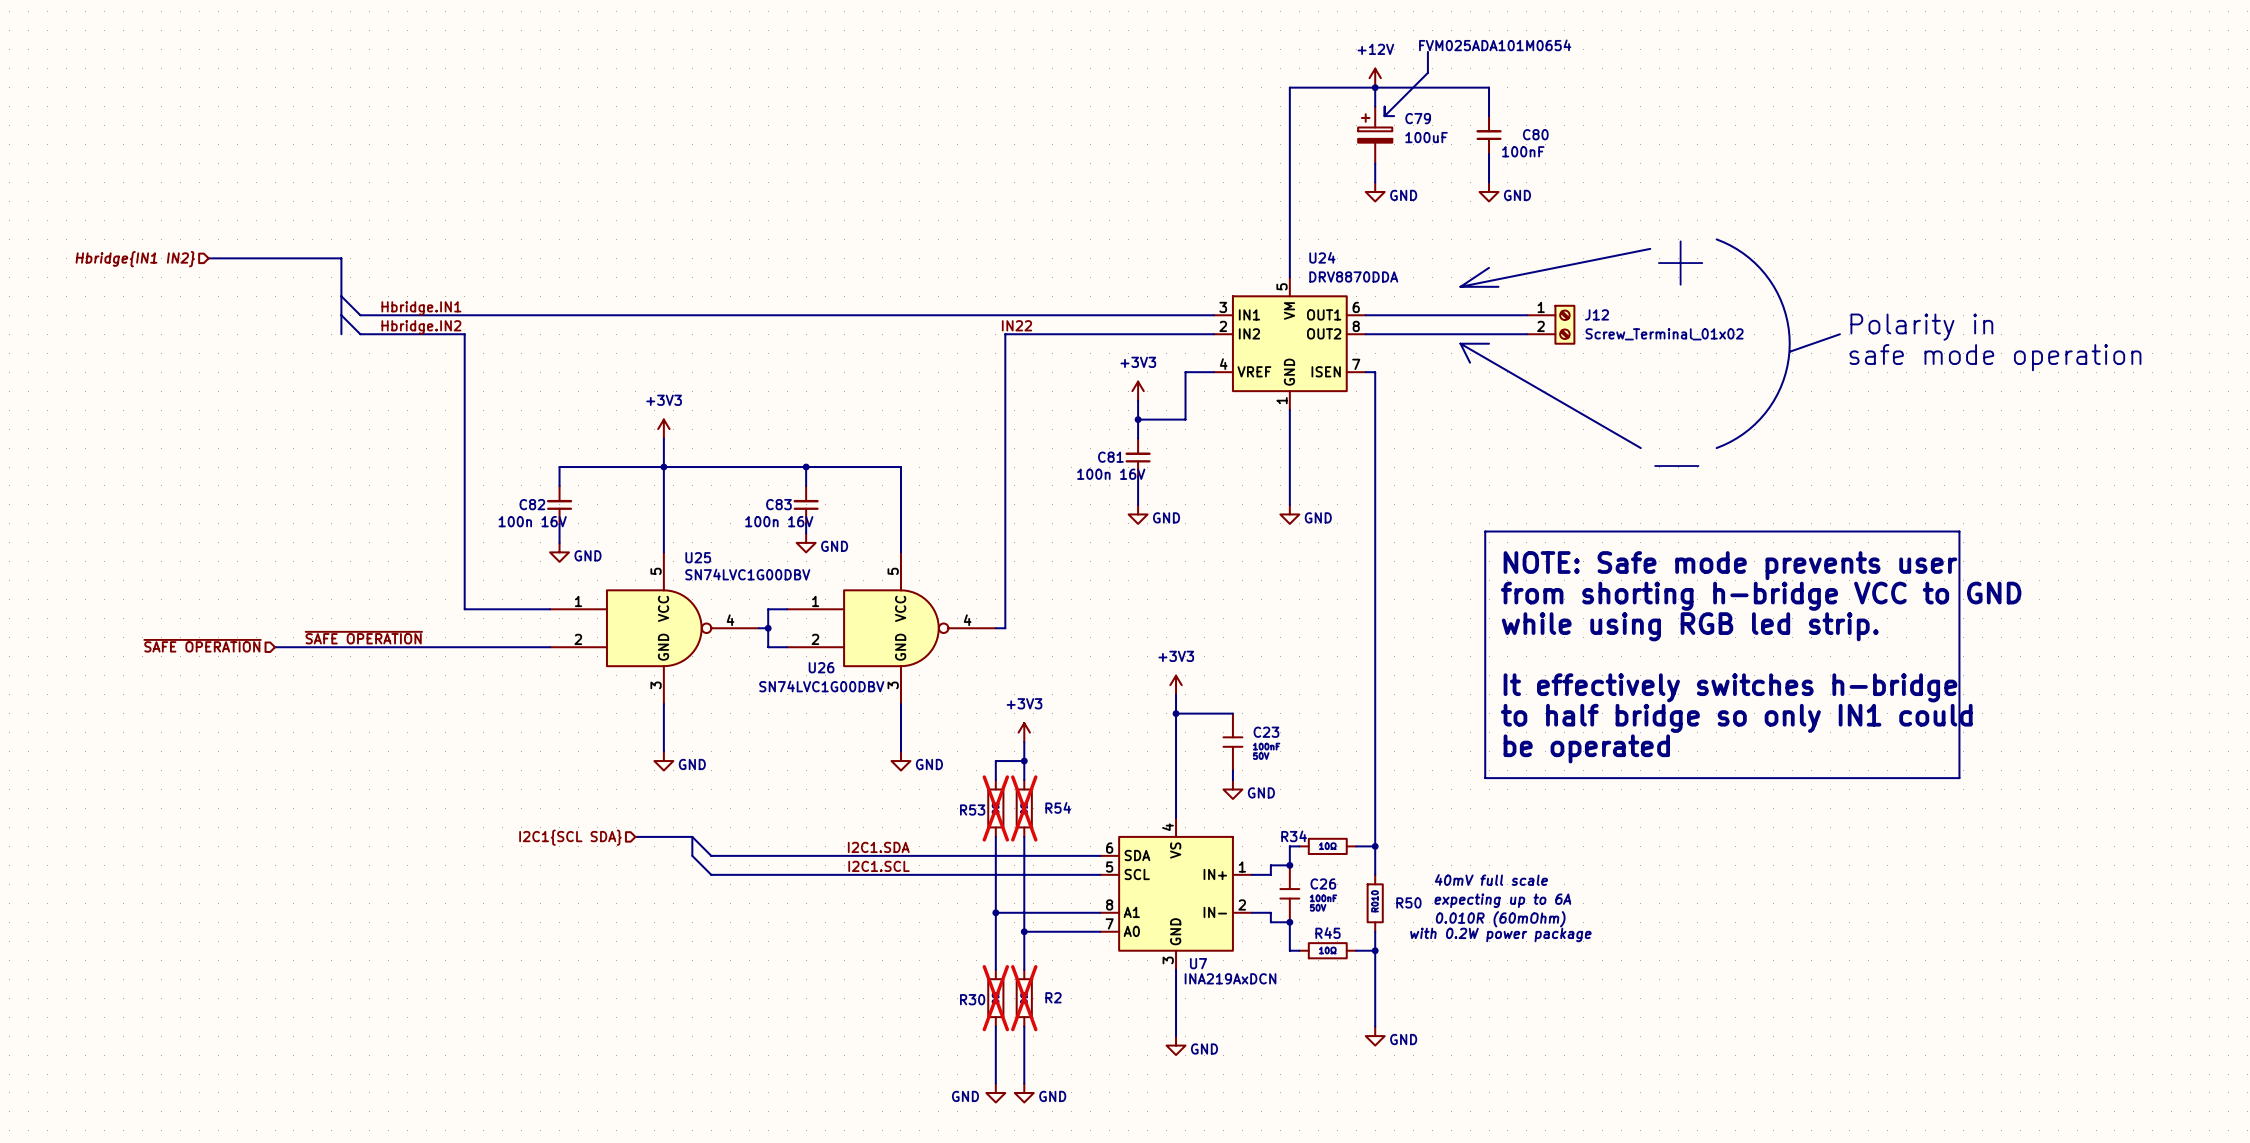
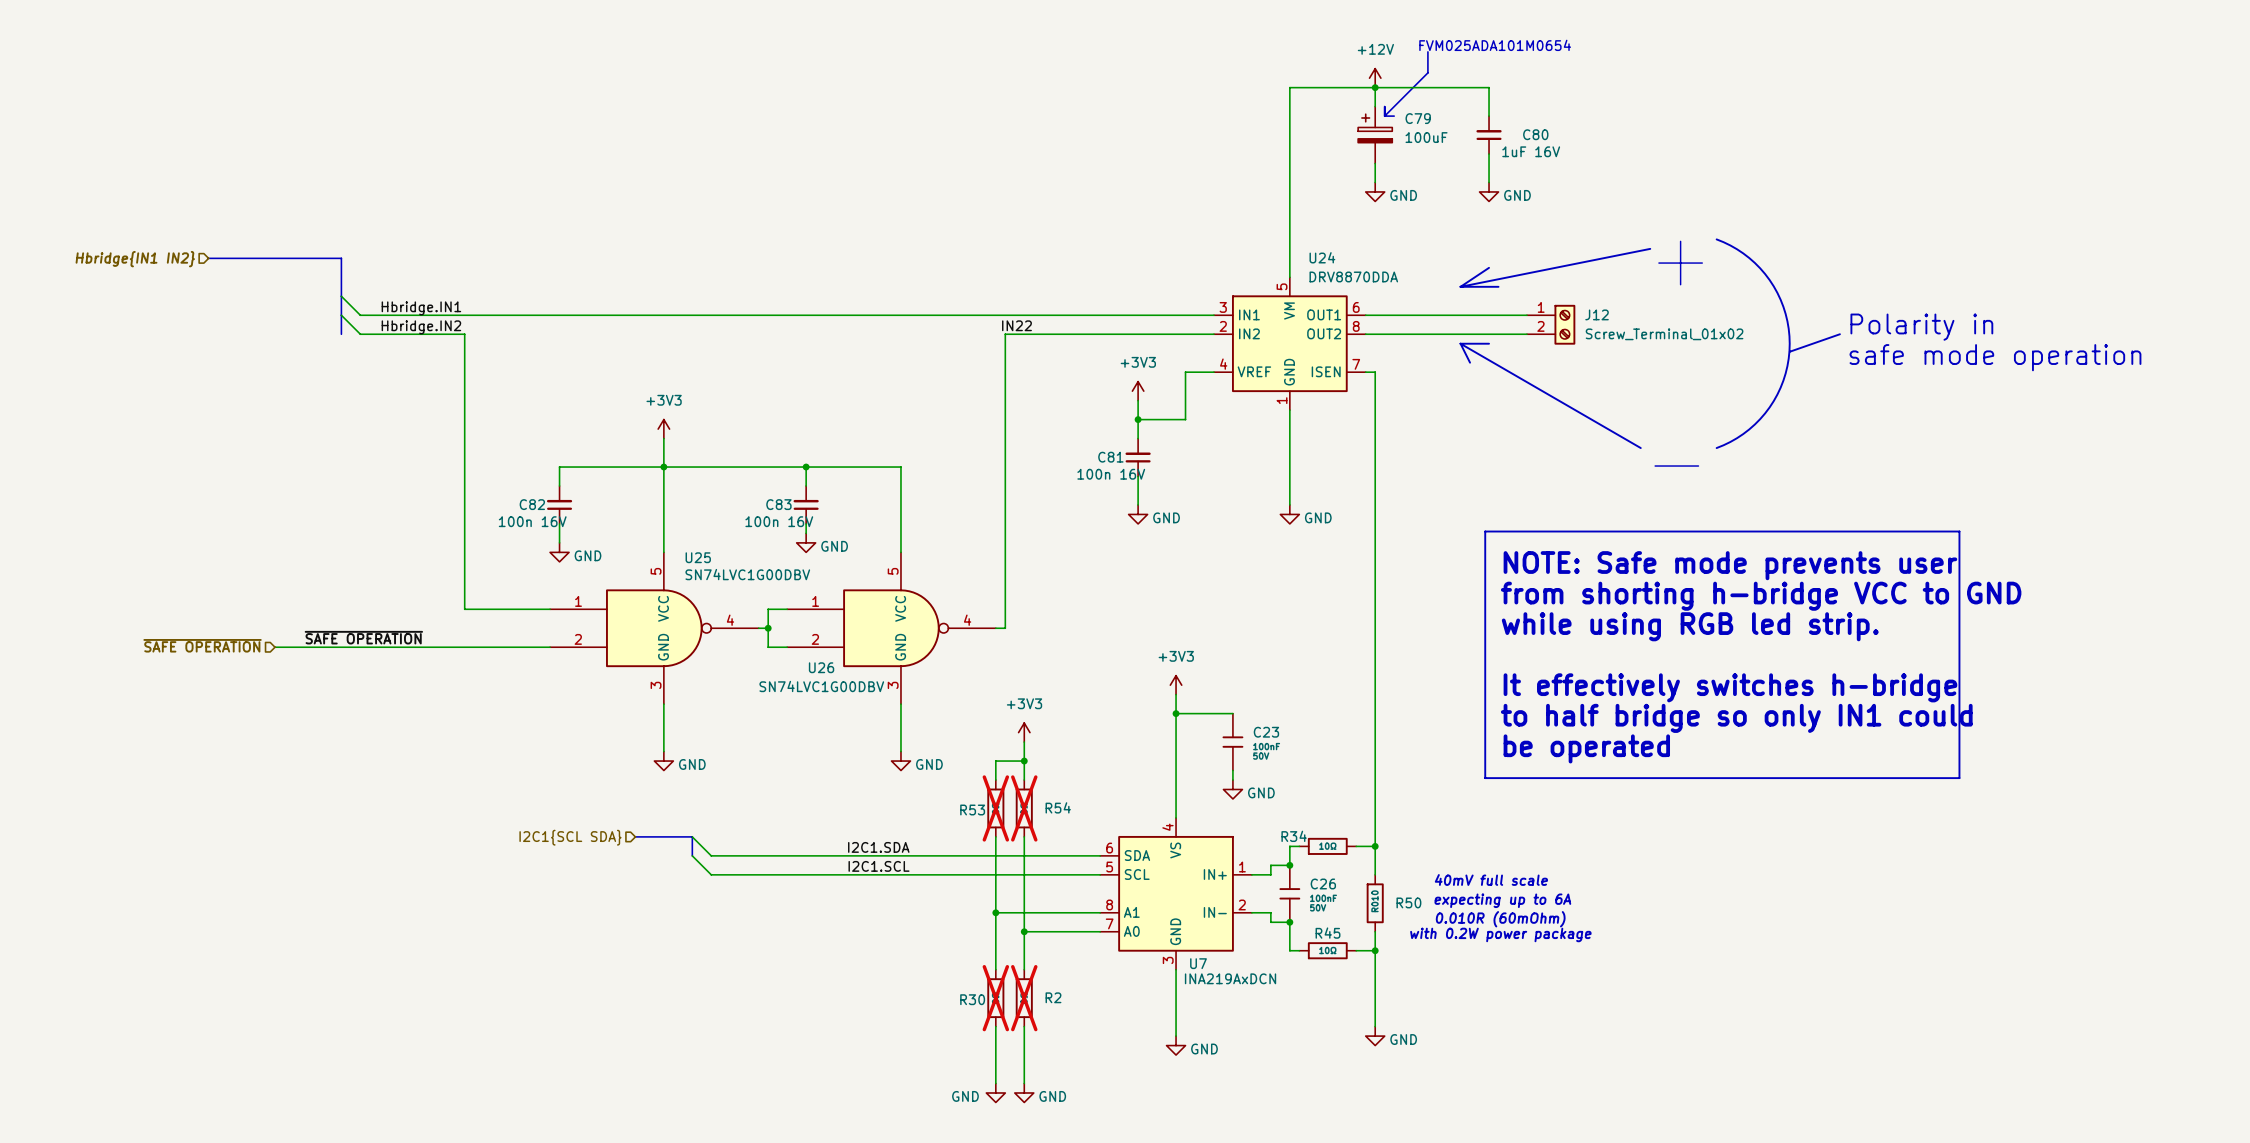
C80 value: 100nF (1523, 151) -> 1uF 16V (1531, 151)

